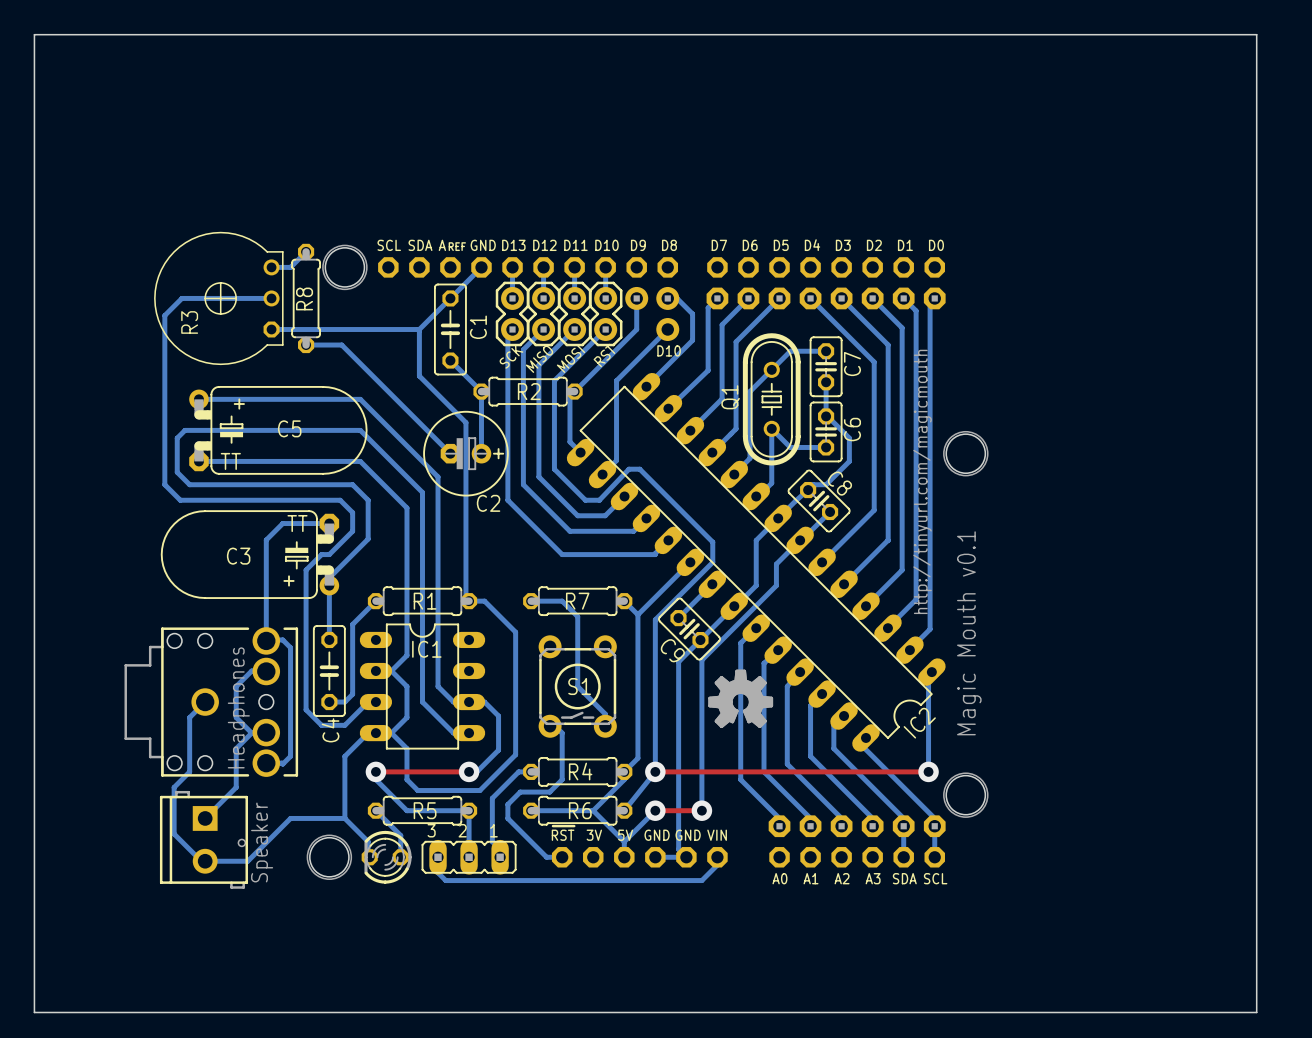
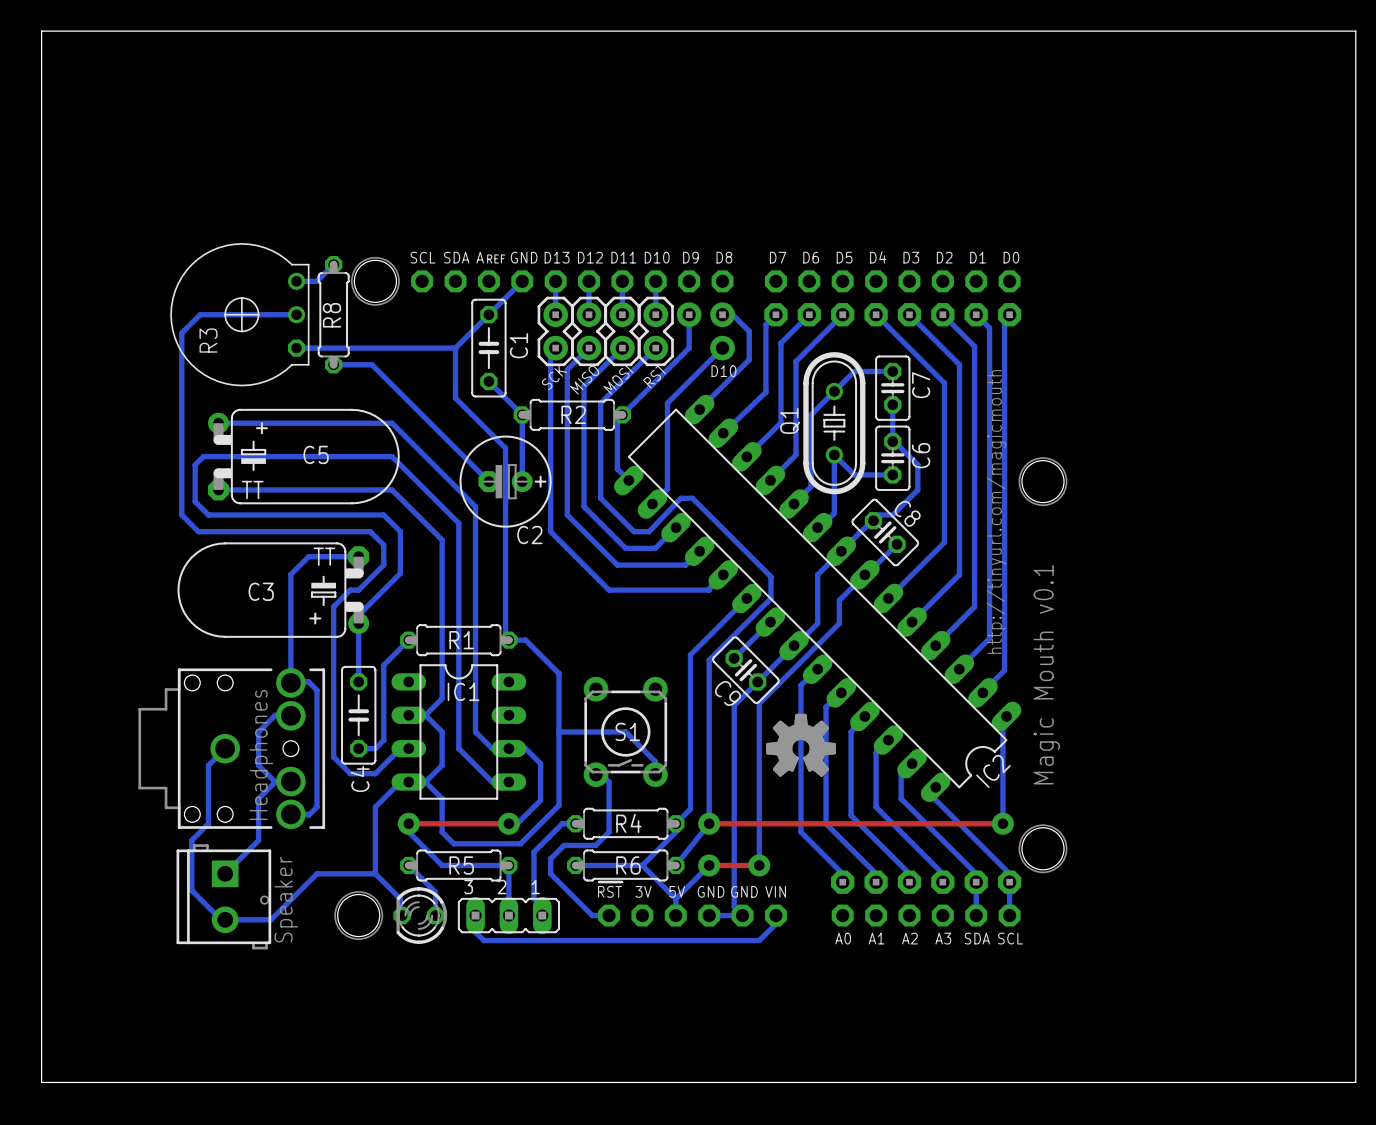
bottom track: (531, 601) (562, 601) (577, 616) (577, 686) -> (558, 731) (625, 731)
R7: (577, 601) -> none
bottom track: (624, 601) (637, 614) -> none

